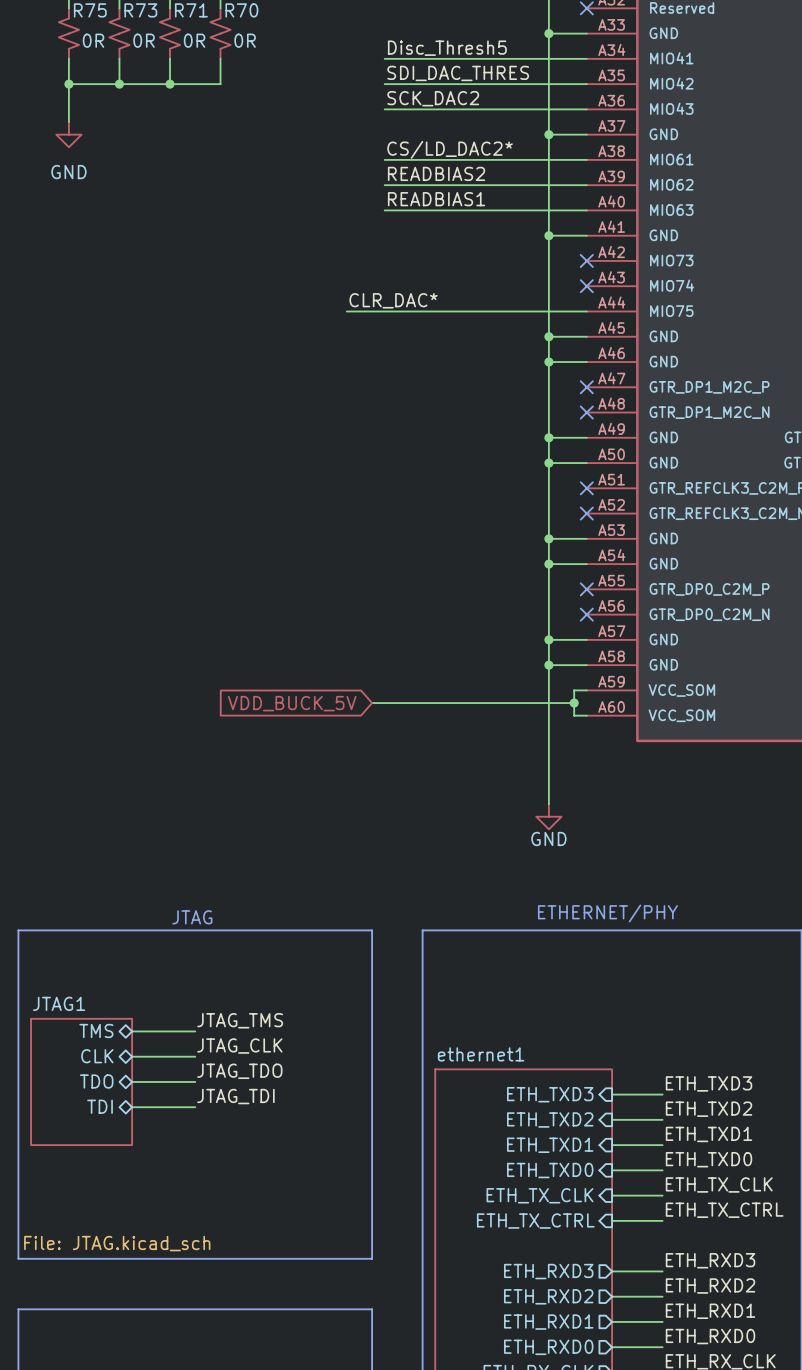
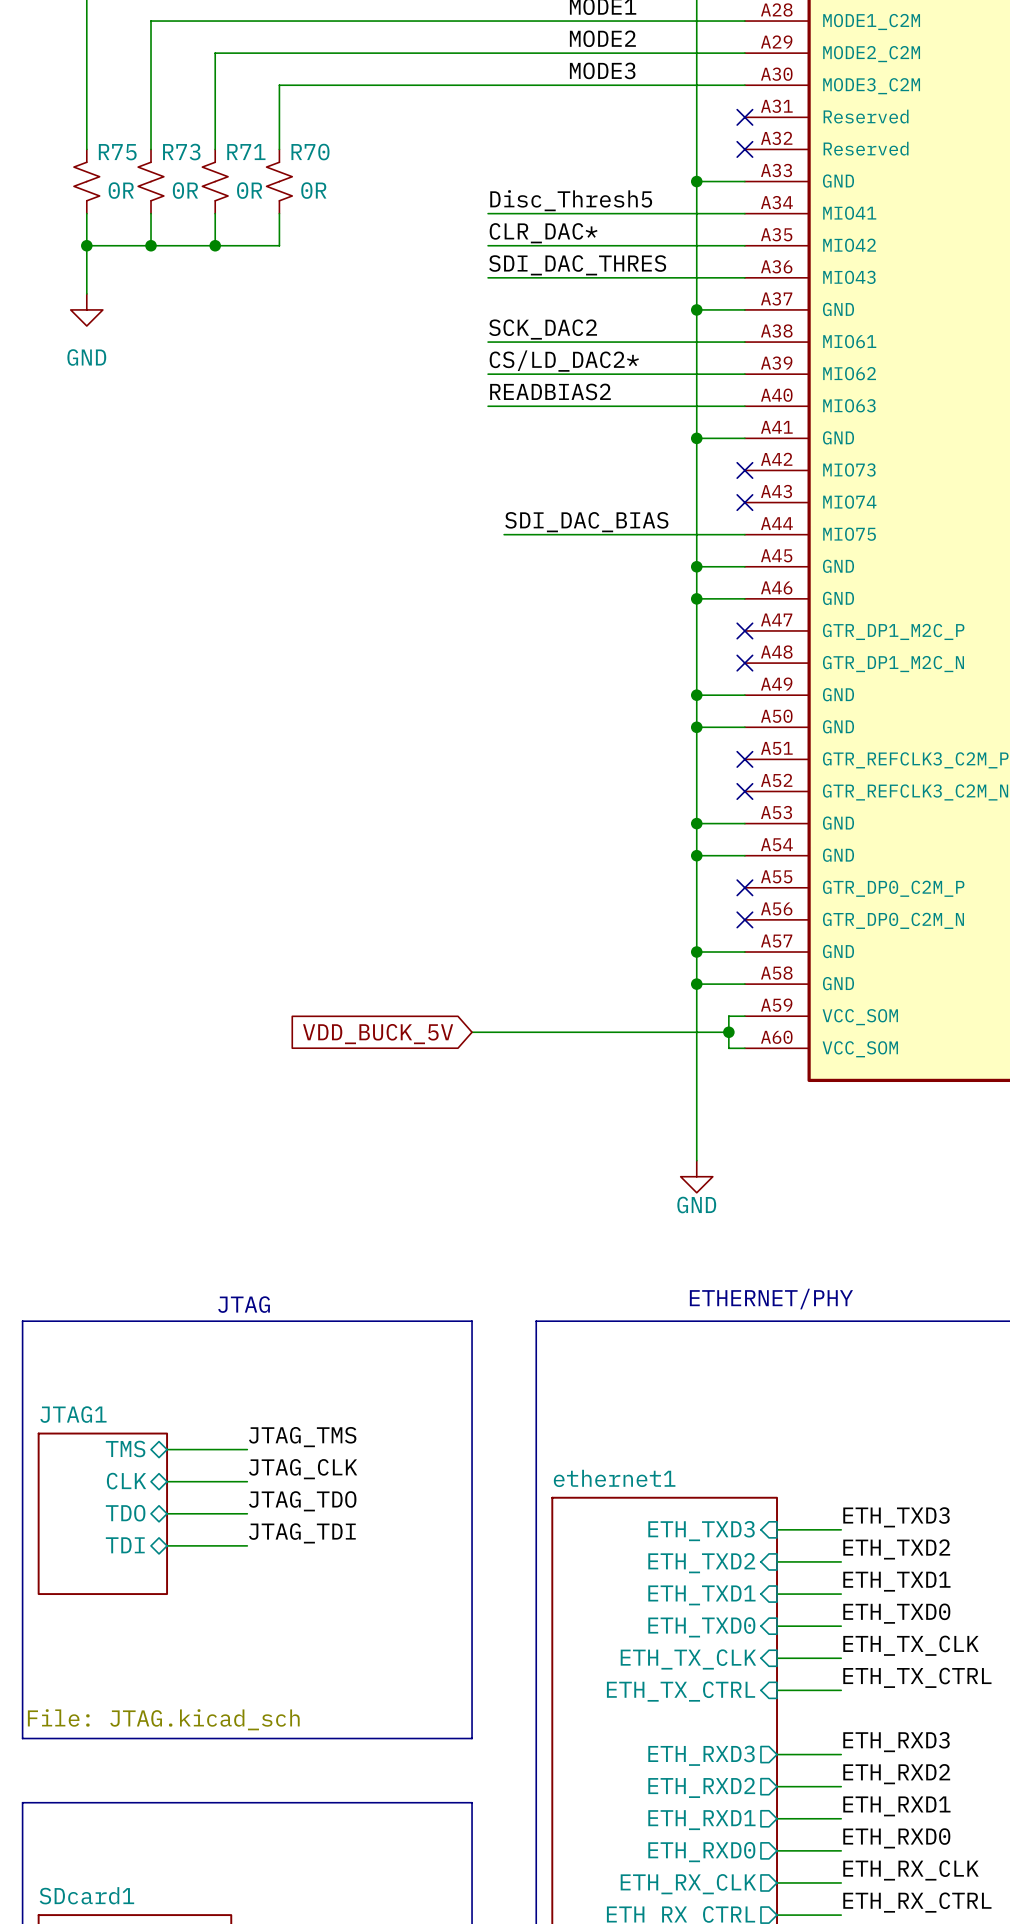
label: SDI_DAC_THRES (458, 73) -> CLR_DAC* (543, 233)
label: SCK_DAC2 (433, 98) -> SDI_DAC_THRES (577, 265)
label: CS/LD_DAC2* (450, 149) -> SCK_DAC2 (543, 329)
label: READBIAS2 (436, 173) -> CS/LD_DAC2* (564, 361)
label: READBIAS1 (436, 199) -> READBIAS2 (550, 391)
label: CLR_DAC* (393, 300) -> none
label: none -> SDI_DAC_BIAS (586, 522)
wire: (346, 311) (397, 311) -> none

